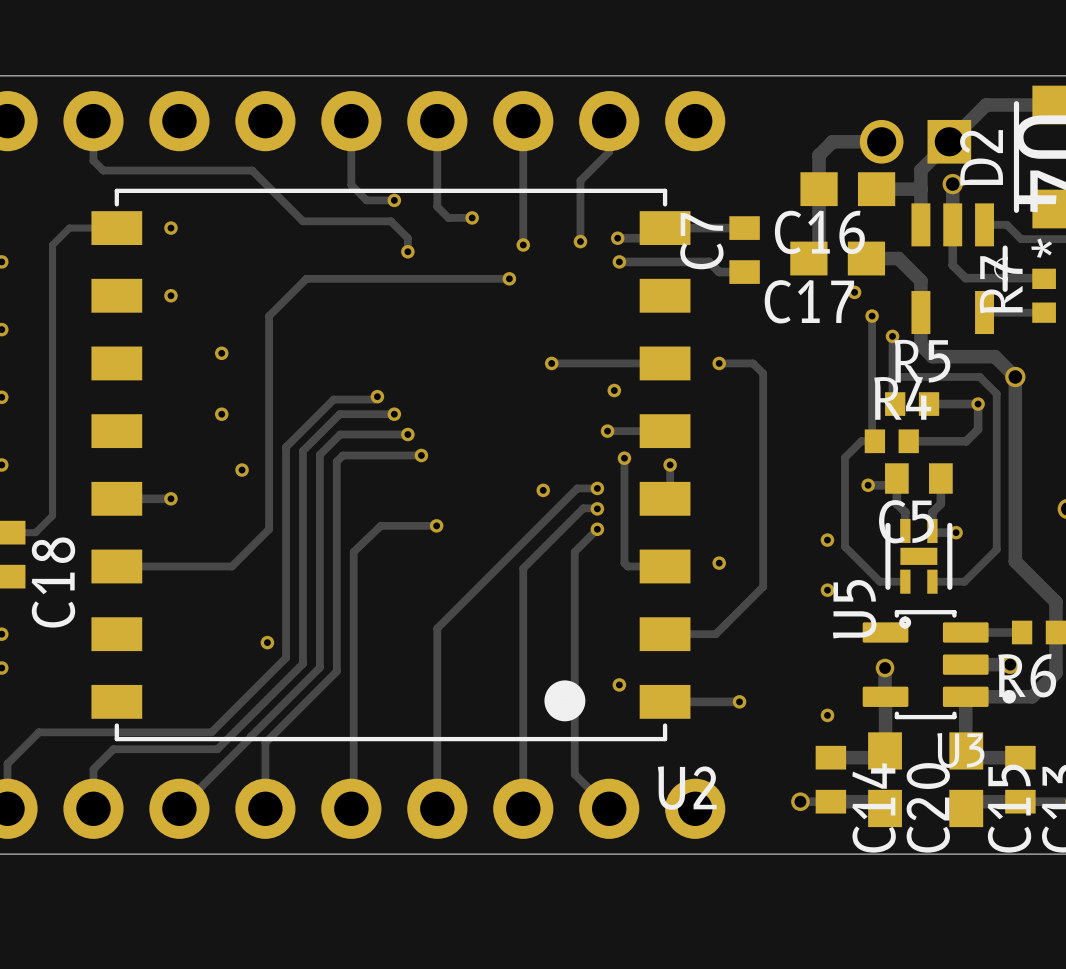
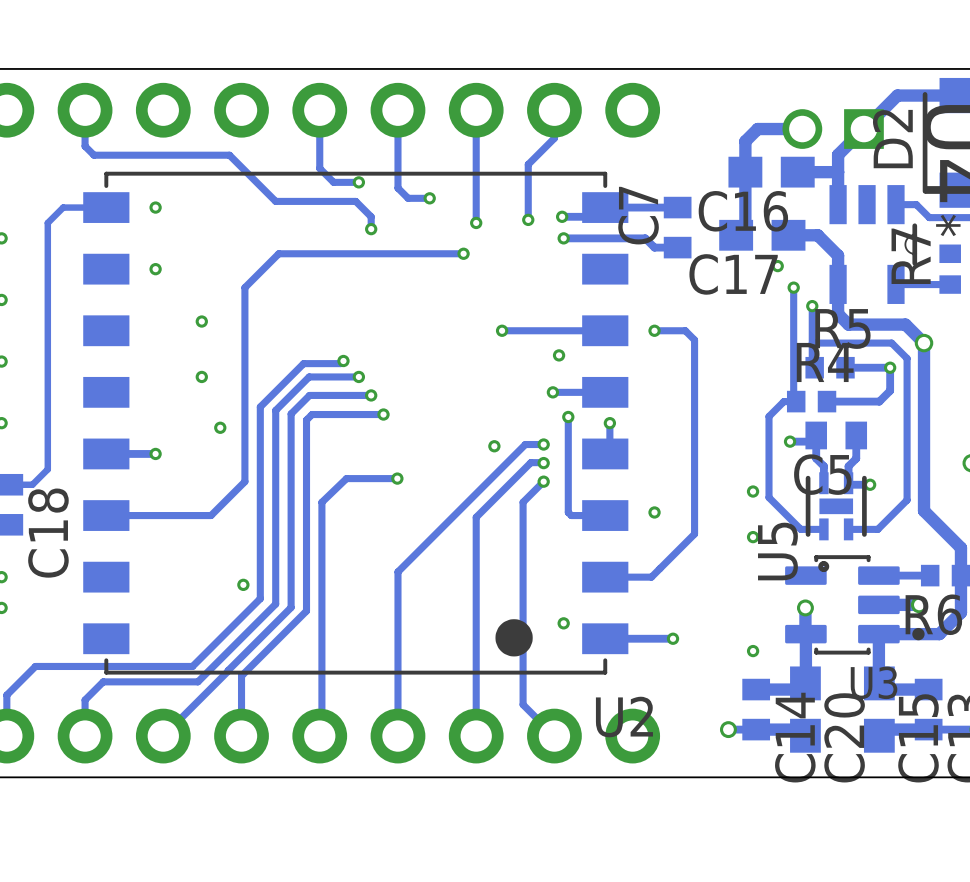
track: (952, 184) (952, 265) (965, 278) (1044, 278) -> none
via: (952, 184) -> none

